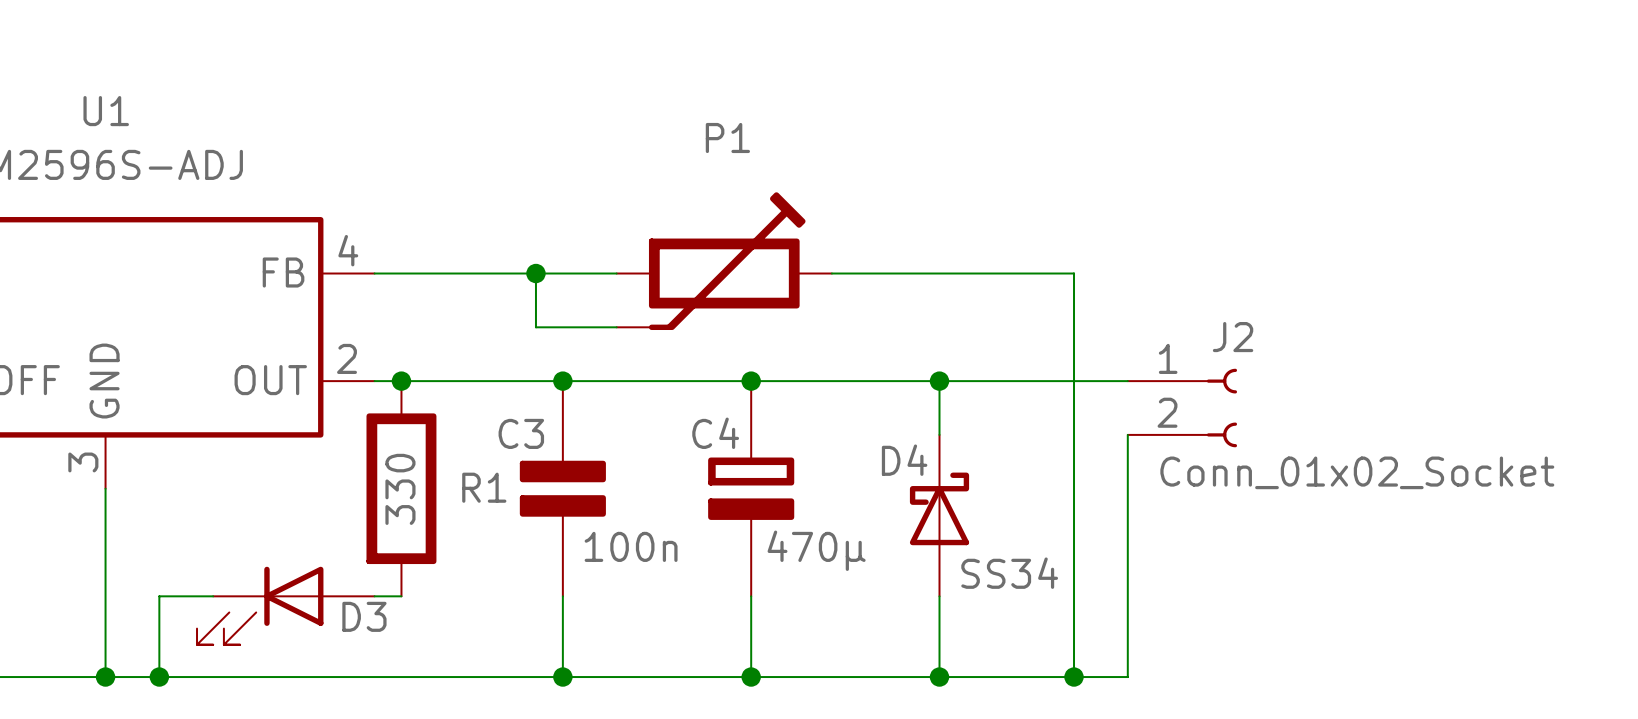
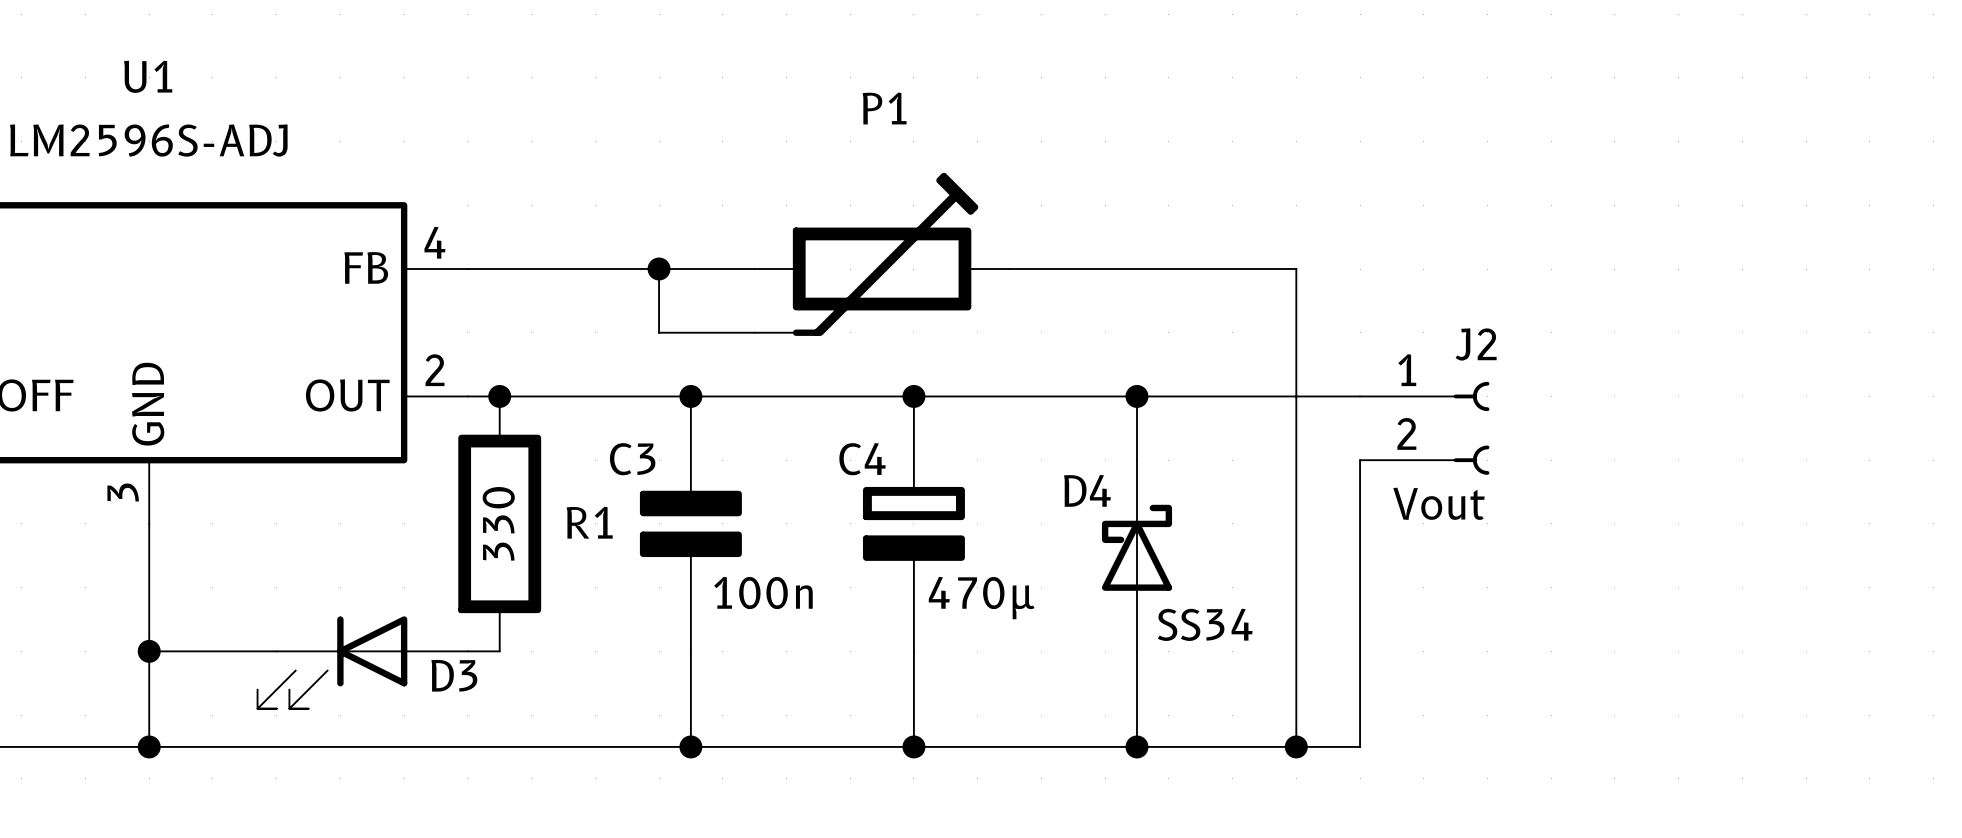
J2 value: Conn_01x02_Socket (1357, 472) -> Vout (1438, 503)
wire: (159, 596) (159, 677) -> (212, 651) (149, 651)
junction position: (159, 677) -> (149, 651)

